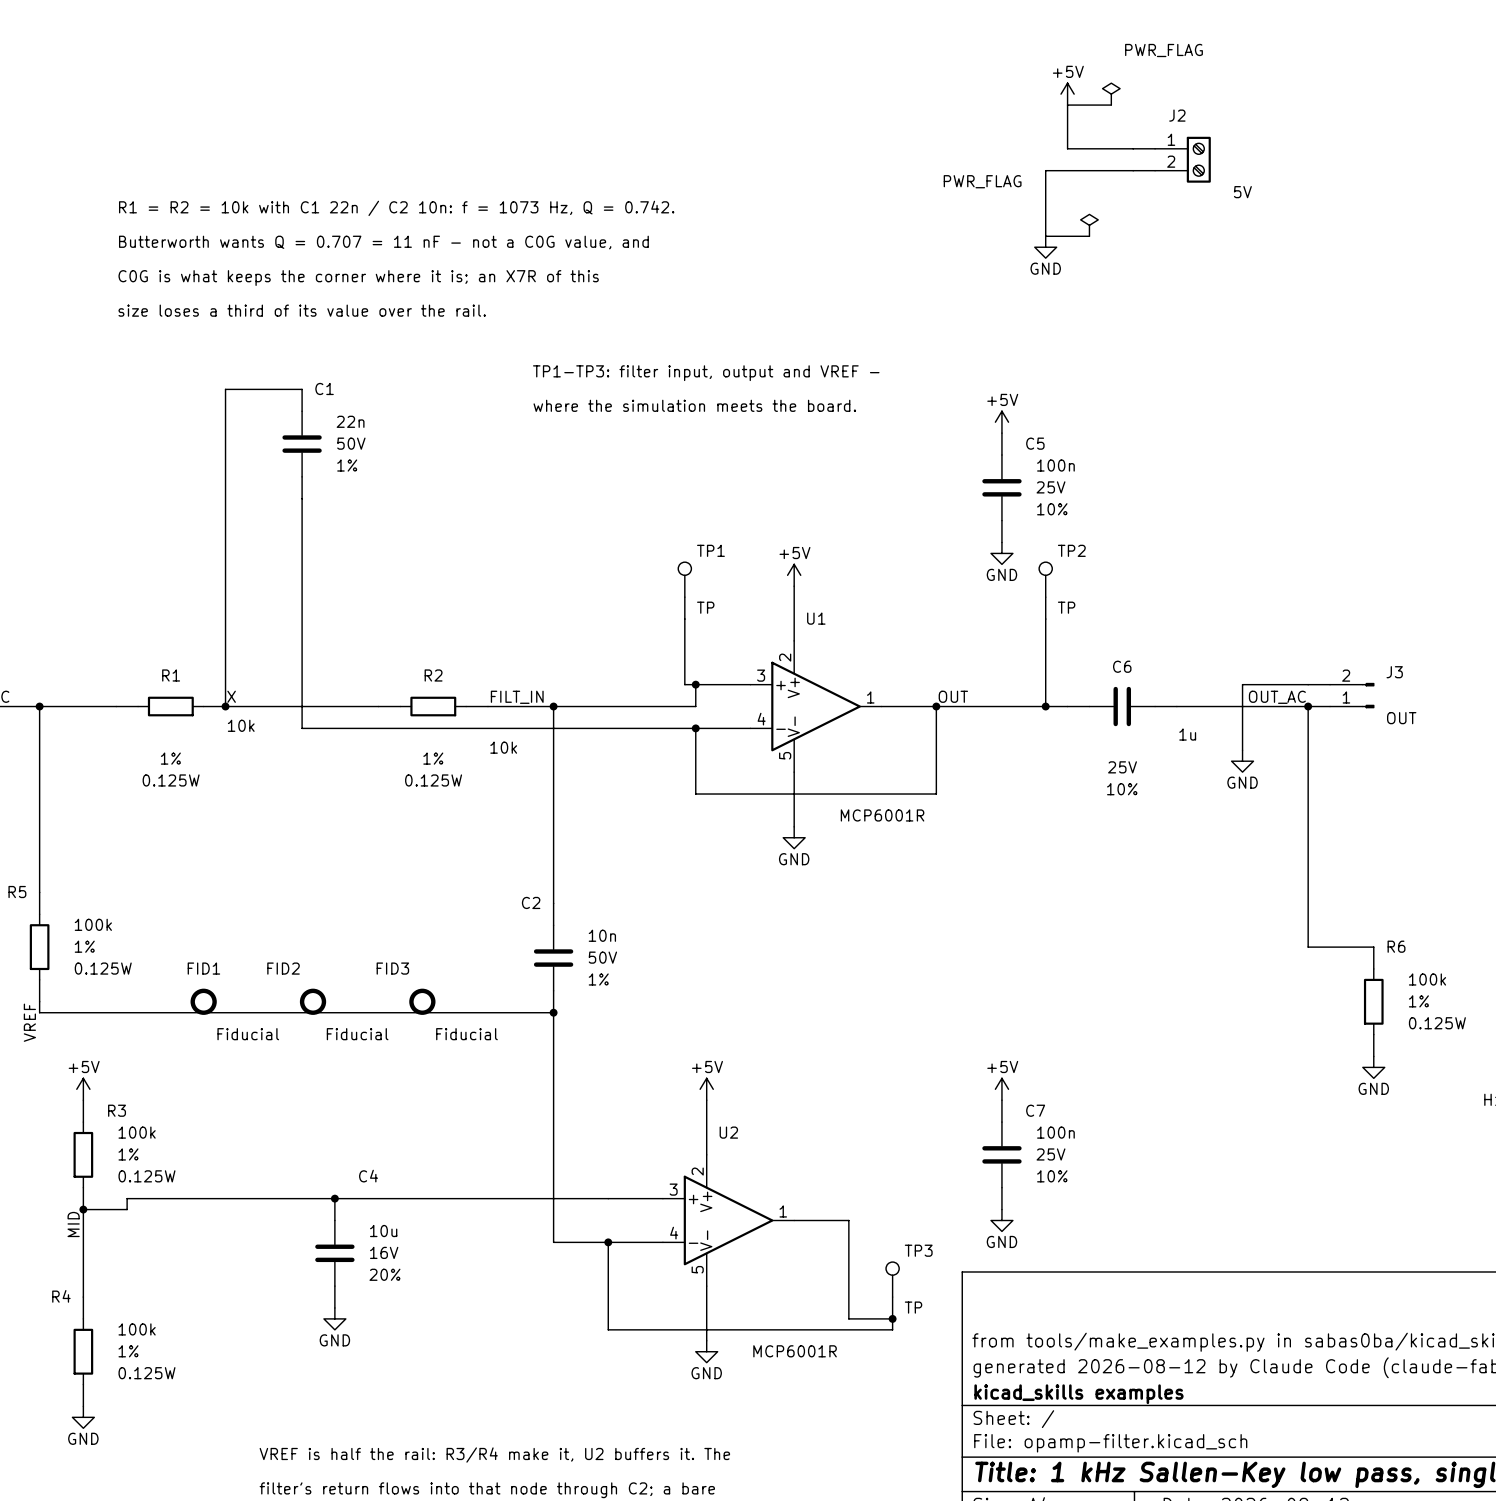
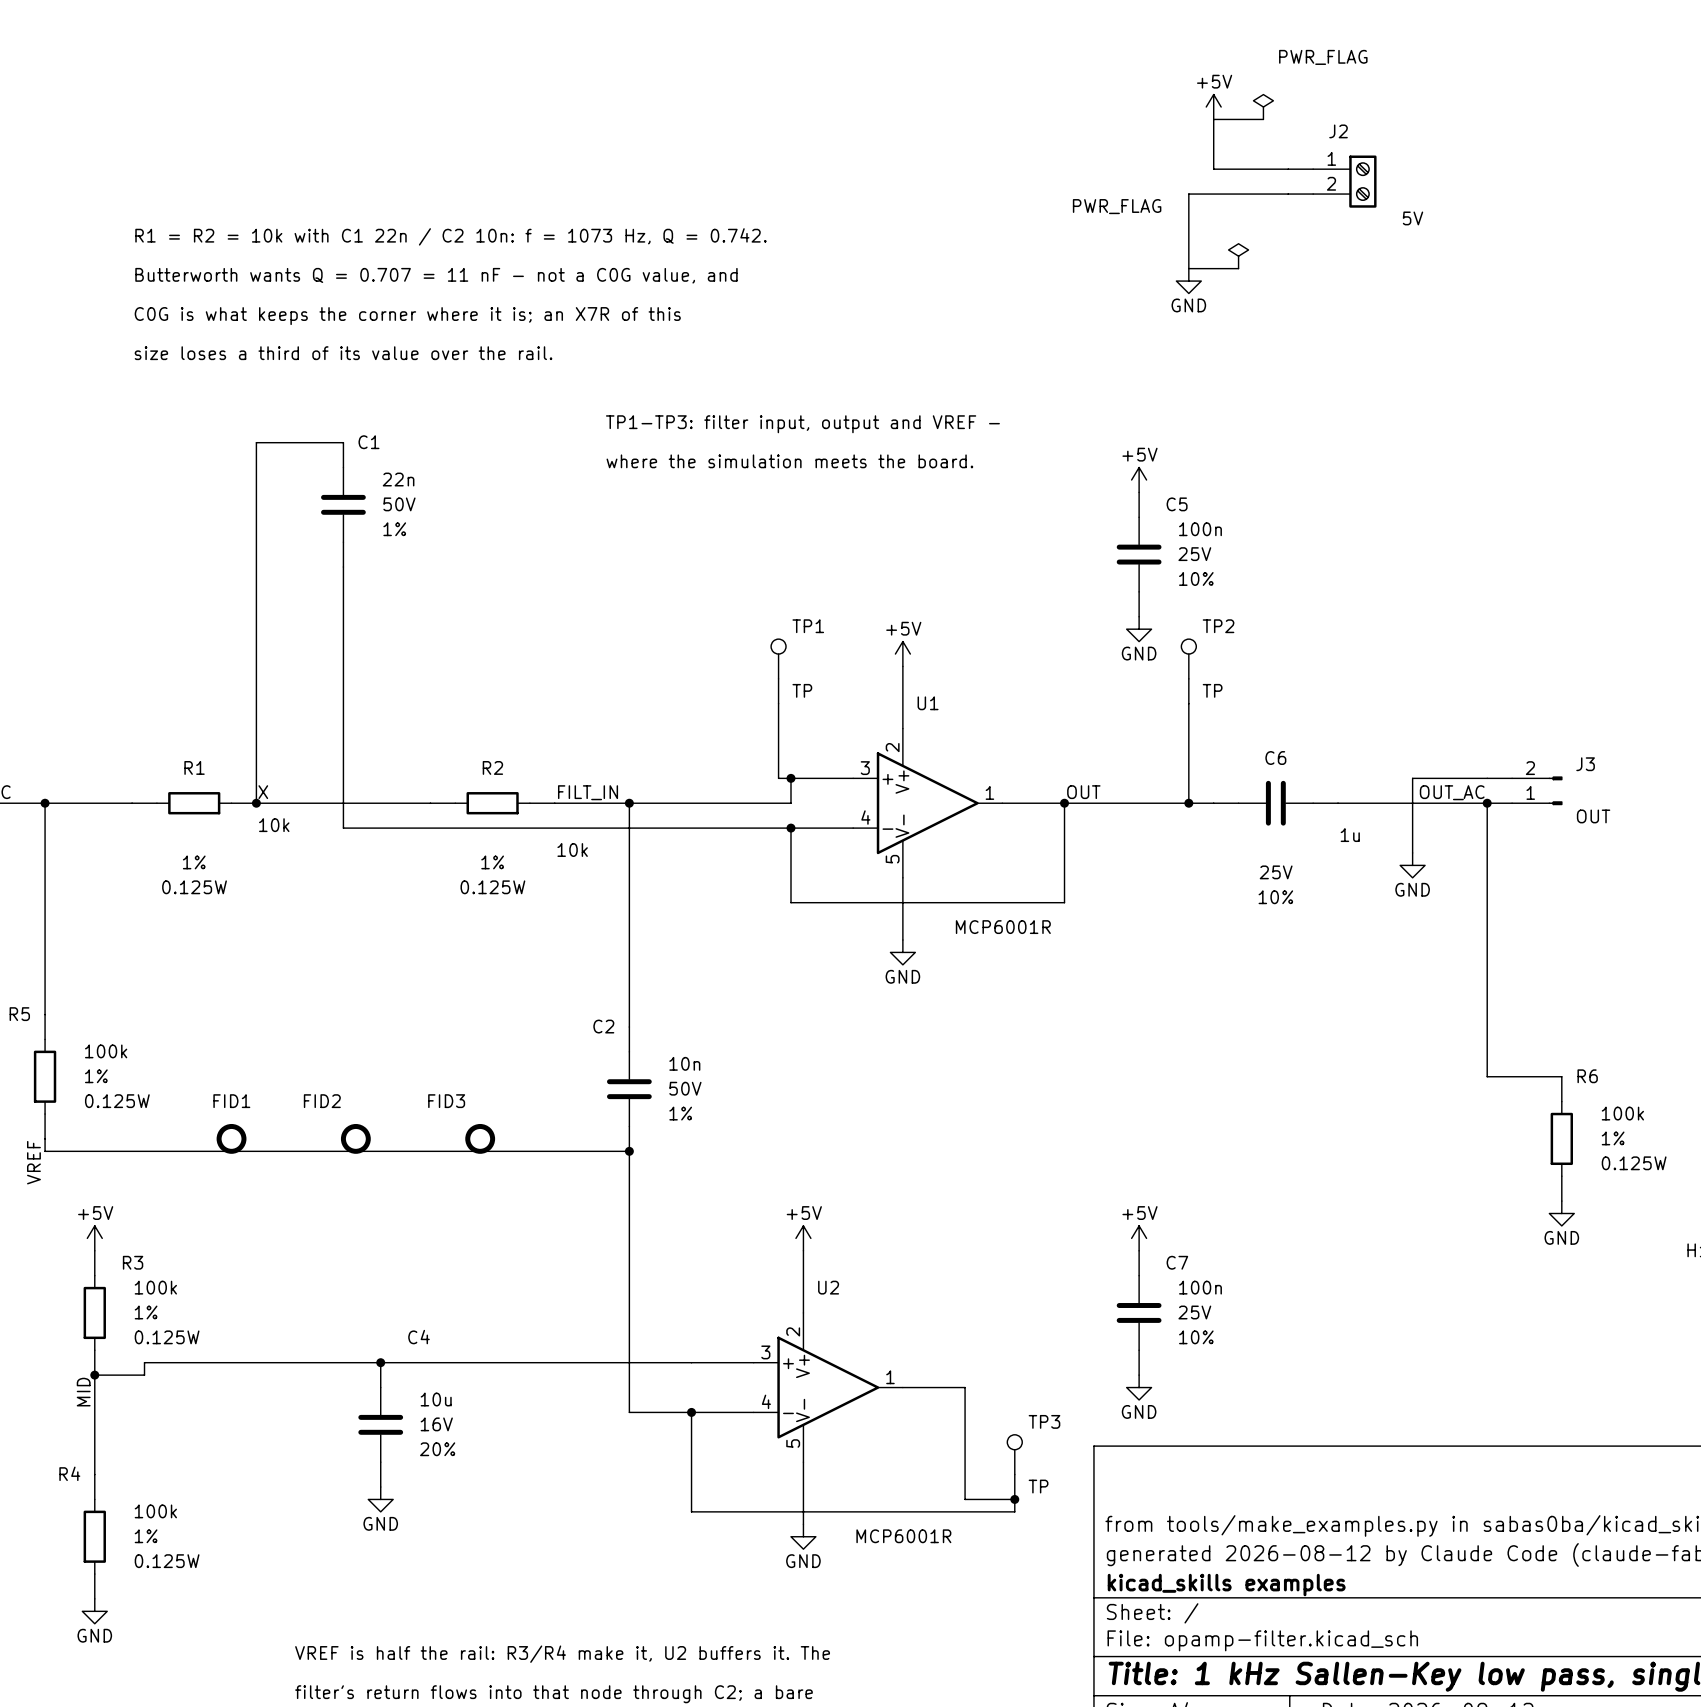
FID1 value: Fiducial (248, 1034) -> none
FID2 value: Fiducial (357, 1034) -> none
FID3 value: Fiducial (466, 1034) -> none

